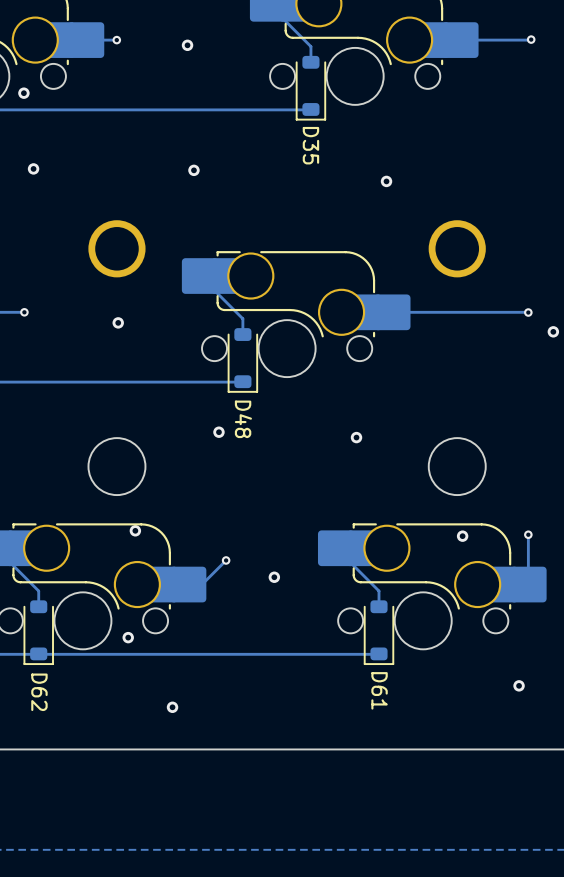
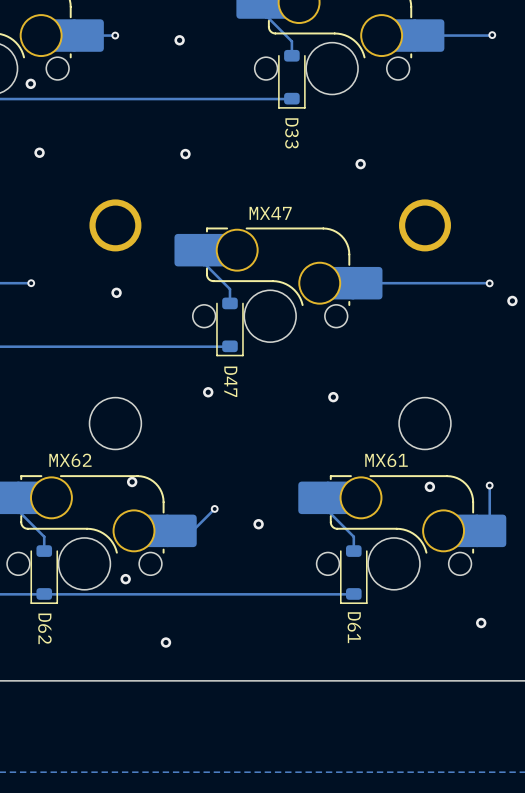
D35 name: D35 (310, 145) -> D33 (291, 133)
MX47 name: none -> MX47 (270, 213)
D48 name: D48 (243, 419) -> D47 (230, 381)
MX62 name: none -> MX62 (70, 460)
MX61 name: none -> MX61 (386, 460)

